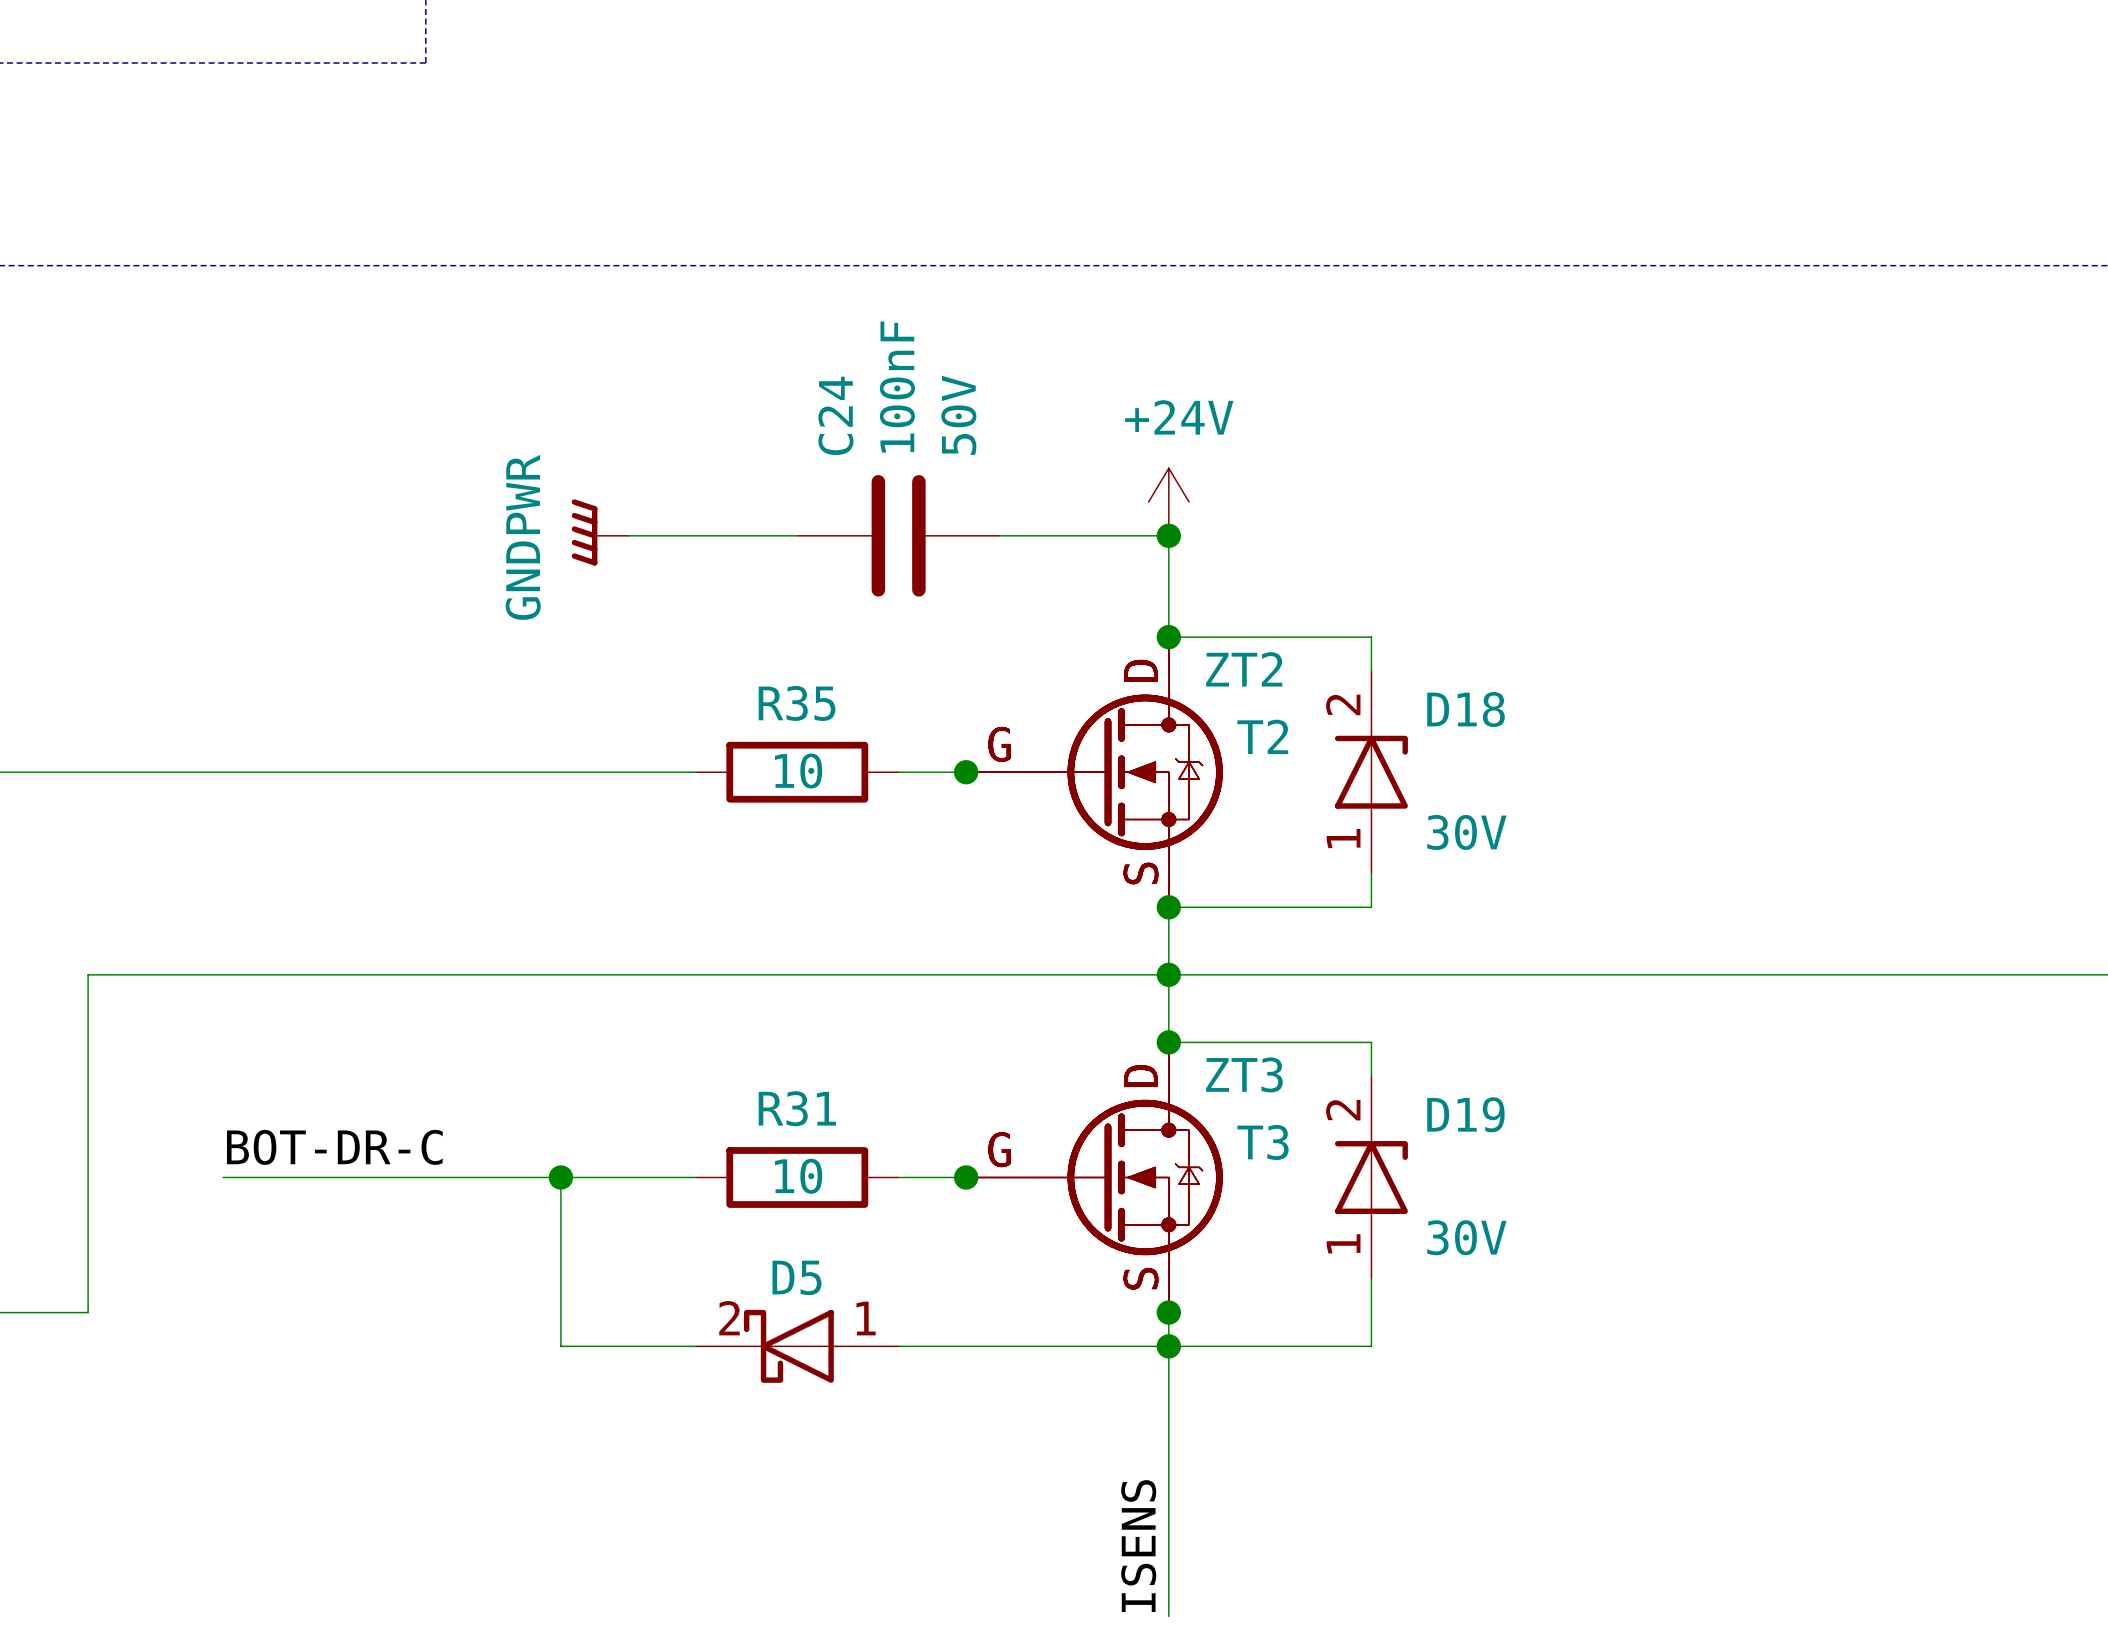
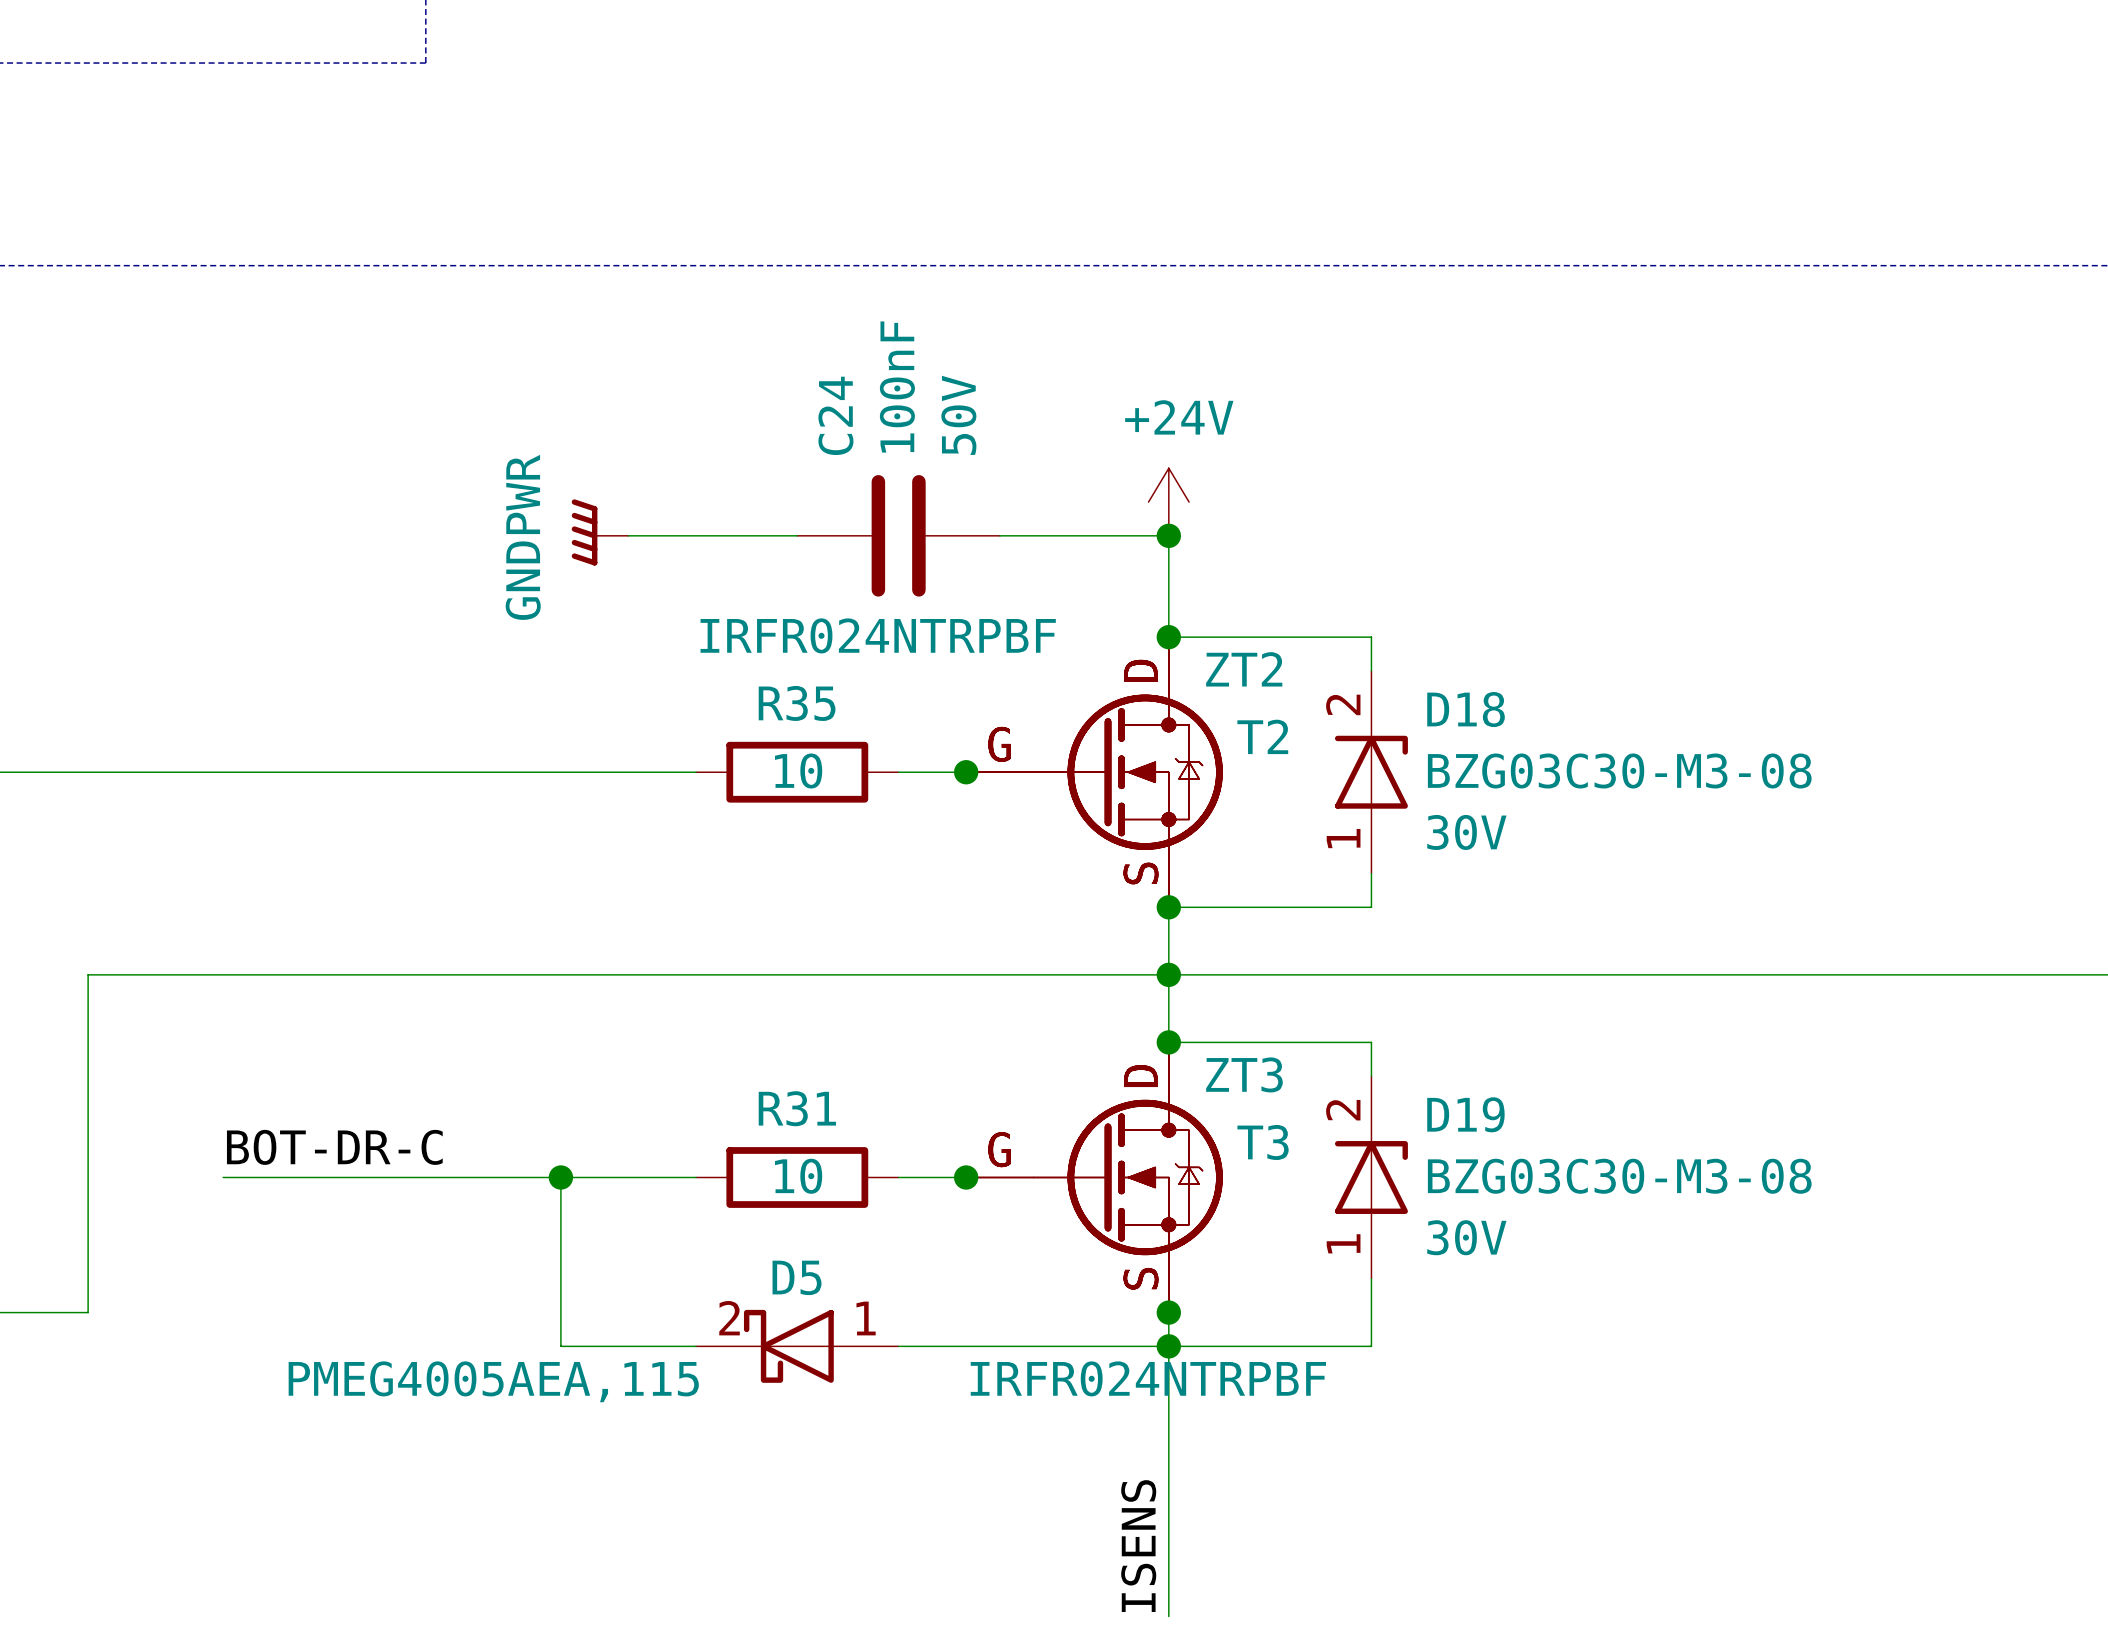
T2 text: none -> IRFR024NTRPBF (878, 635)
D18 text: none -> BZG03C30-M3-08 (1619, 770)
D19 text: none -> BZG03C30-M3-08 (1619, 1176)
T3 text: none -> IRFR024NTRPBF (1148, 1378)
D5 text: none -> PMEG4005AEA,115 (493, 1381)

